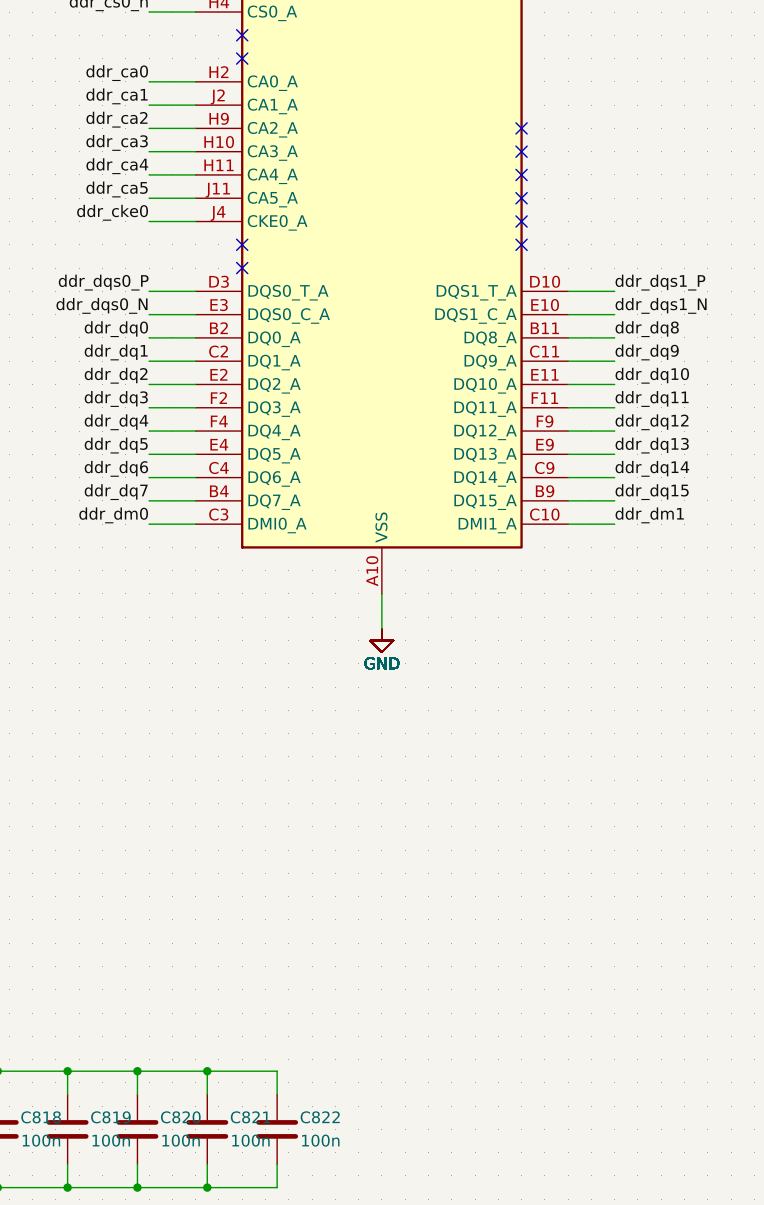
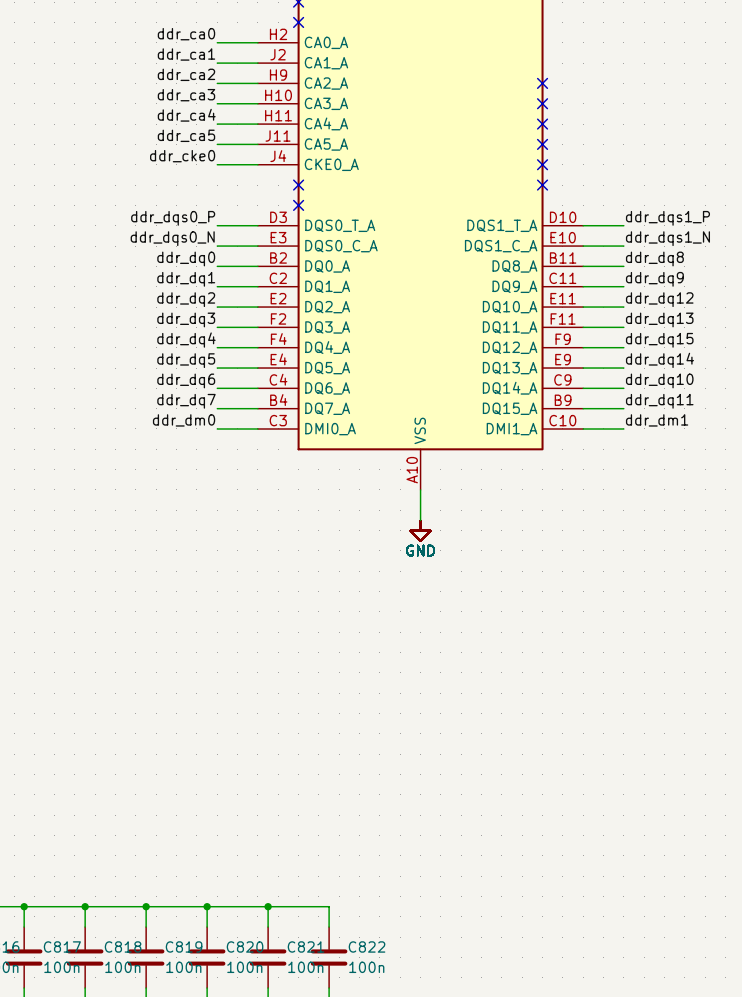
label: ddr_dq10 (652, 375) -> ddr_dq12 (659, 299)
label: ddr_dq11 (652, 399) -> ddr_dq13 (659, 319)
label: ddr_dq12 (652, 422) -> ddr_dq15 (659, 340)
label: ddr_dq13 (652, 445) -> ddr_dq14 (659, 360)
label: ddr_dq14 (652, 468) -> ddr_dq10 (659, 380)
label: ddr_dq15 (652, 492) -> ddr_dq11 (659, 401)

